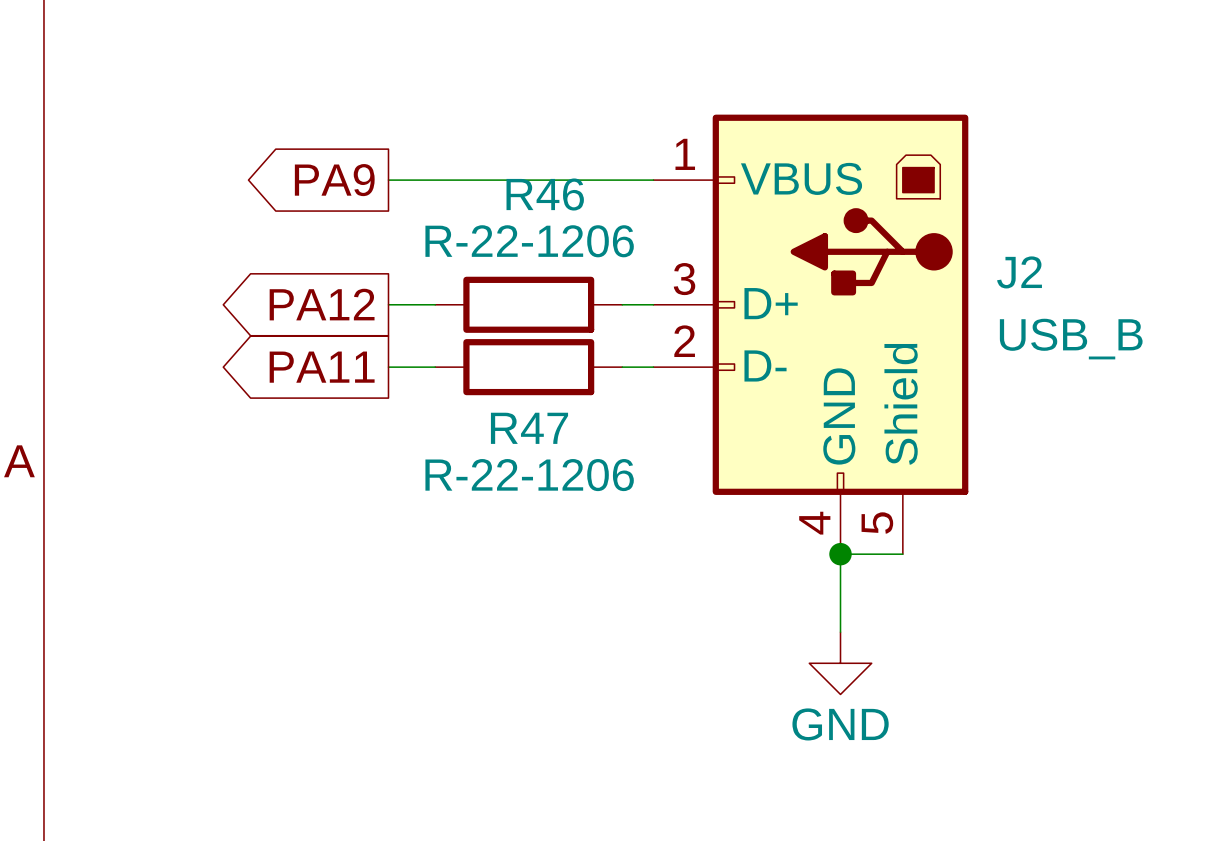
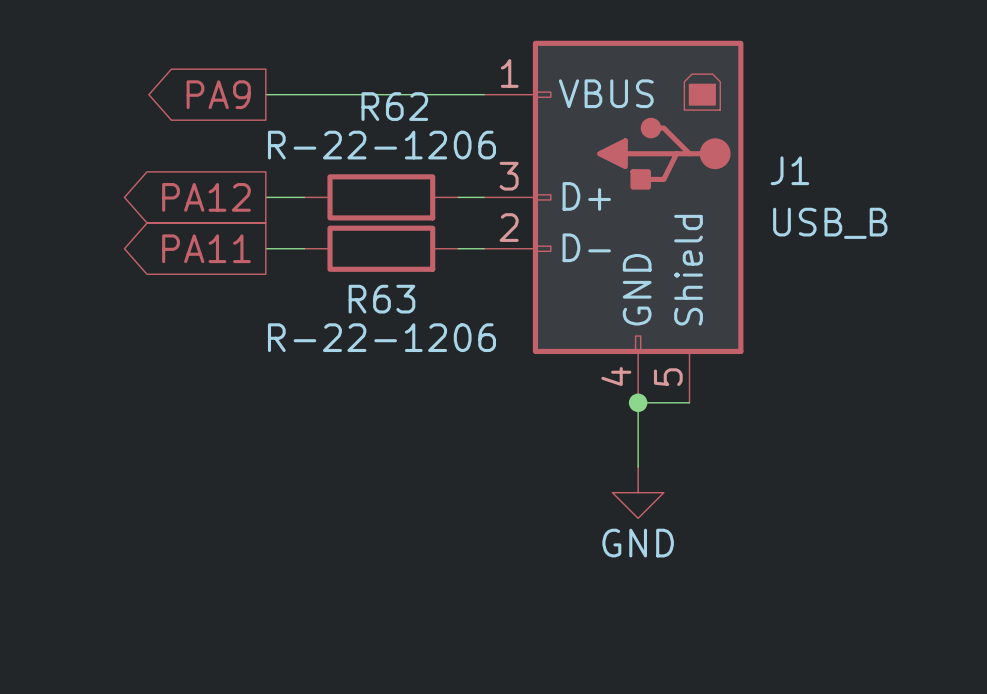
R46 name: R46 (545, 194) -> R62 (394, 106)
J2 name: J2 (1019, 272) -> J1 (789, 170)
R47 name: R47 (529, 428) -> R63 (381, 299)

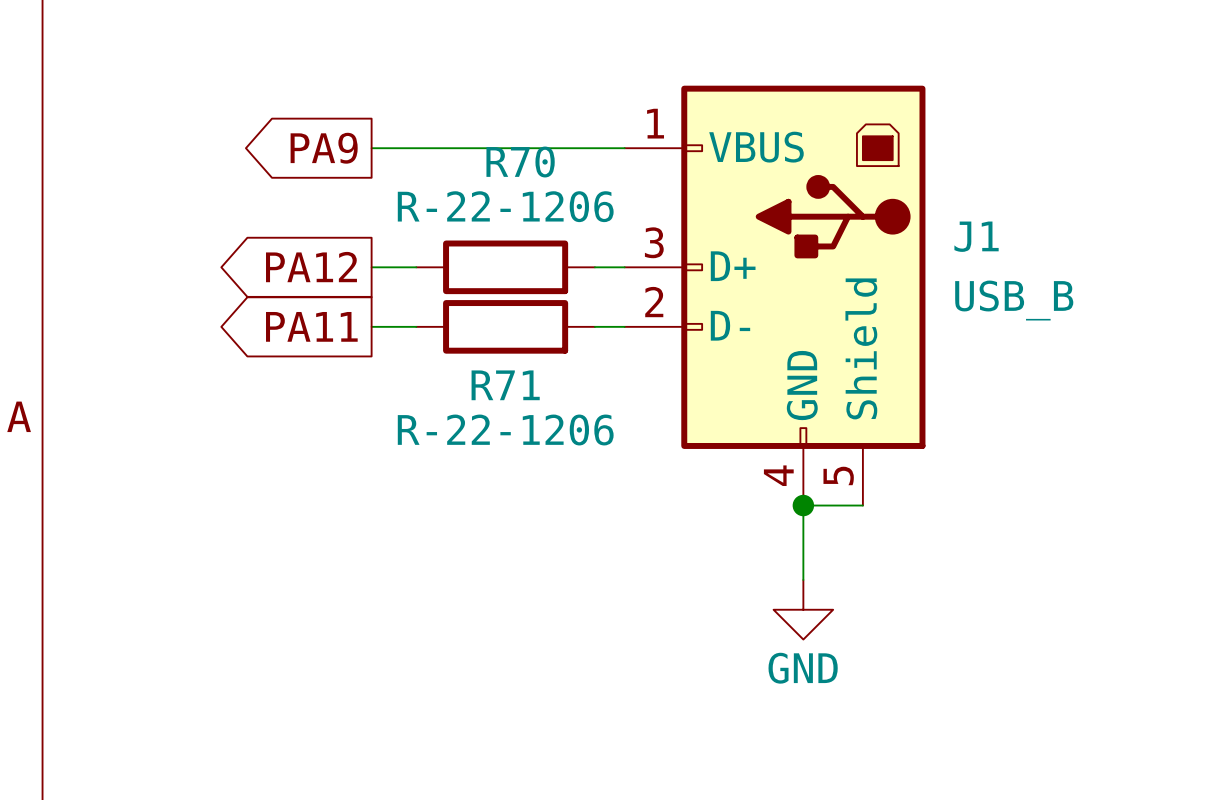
R62 name: R62 (394, 106) -> R70 (520, 162)
R63 name: R63 (381, 299) -> R71 (505, 385)

